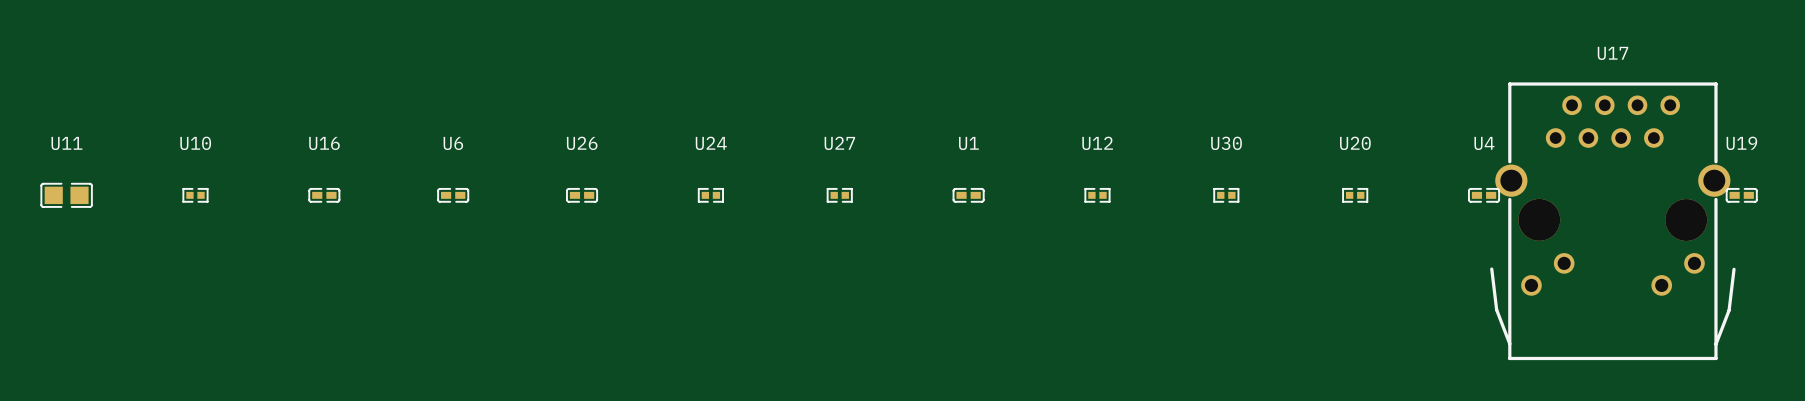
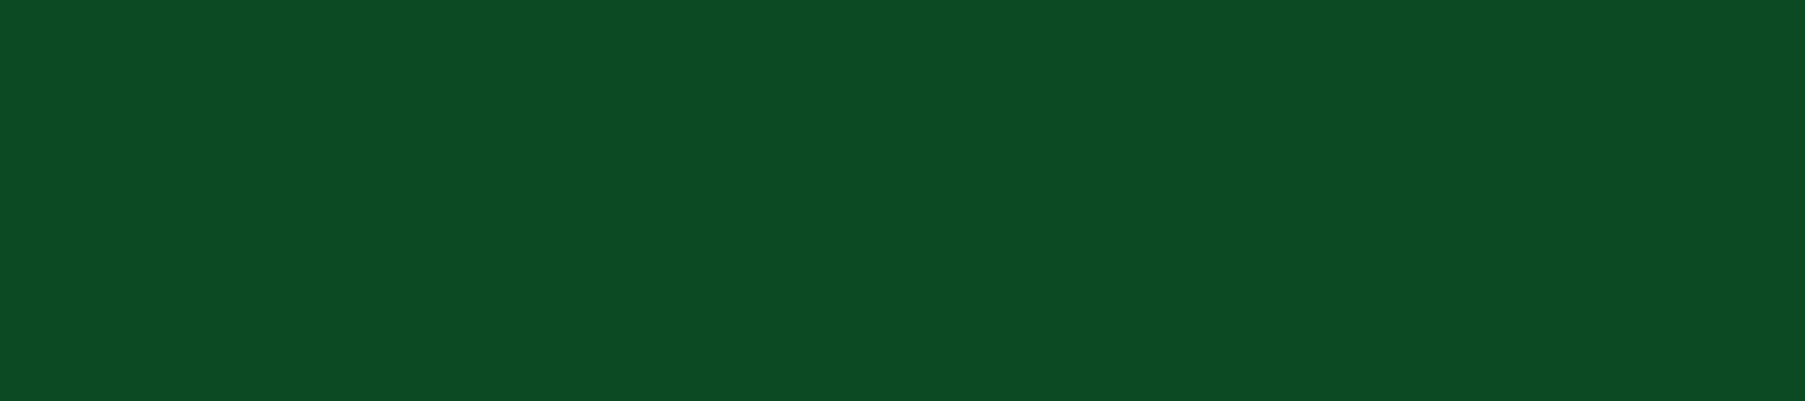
U11: (66, 195) -> none
U10: (195, 195) -> none
U16: (324, 195) -> none
U6: (453, 195) -> none
U26: (582, 195) -> none
U24: (710, 195) -> none
U27: (839, 195) -> none
U1: (968, 195) -> none
U12: (1097, 195) -> none
U30: (1226, 195) -> none
U20: (1355, 195) -> none
U4: (1484, 195) -> none
U19: (1741, 195) -> none
U17: (1612, 221) -> none

